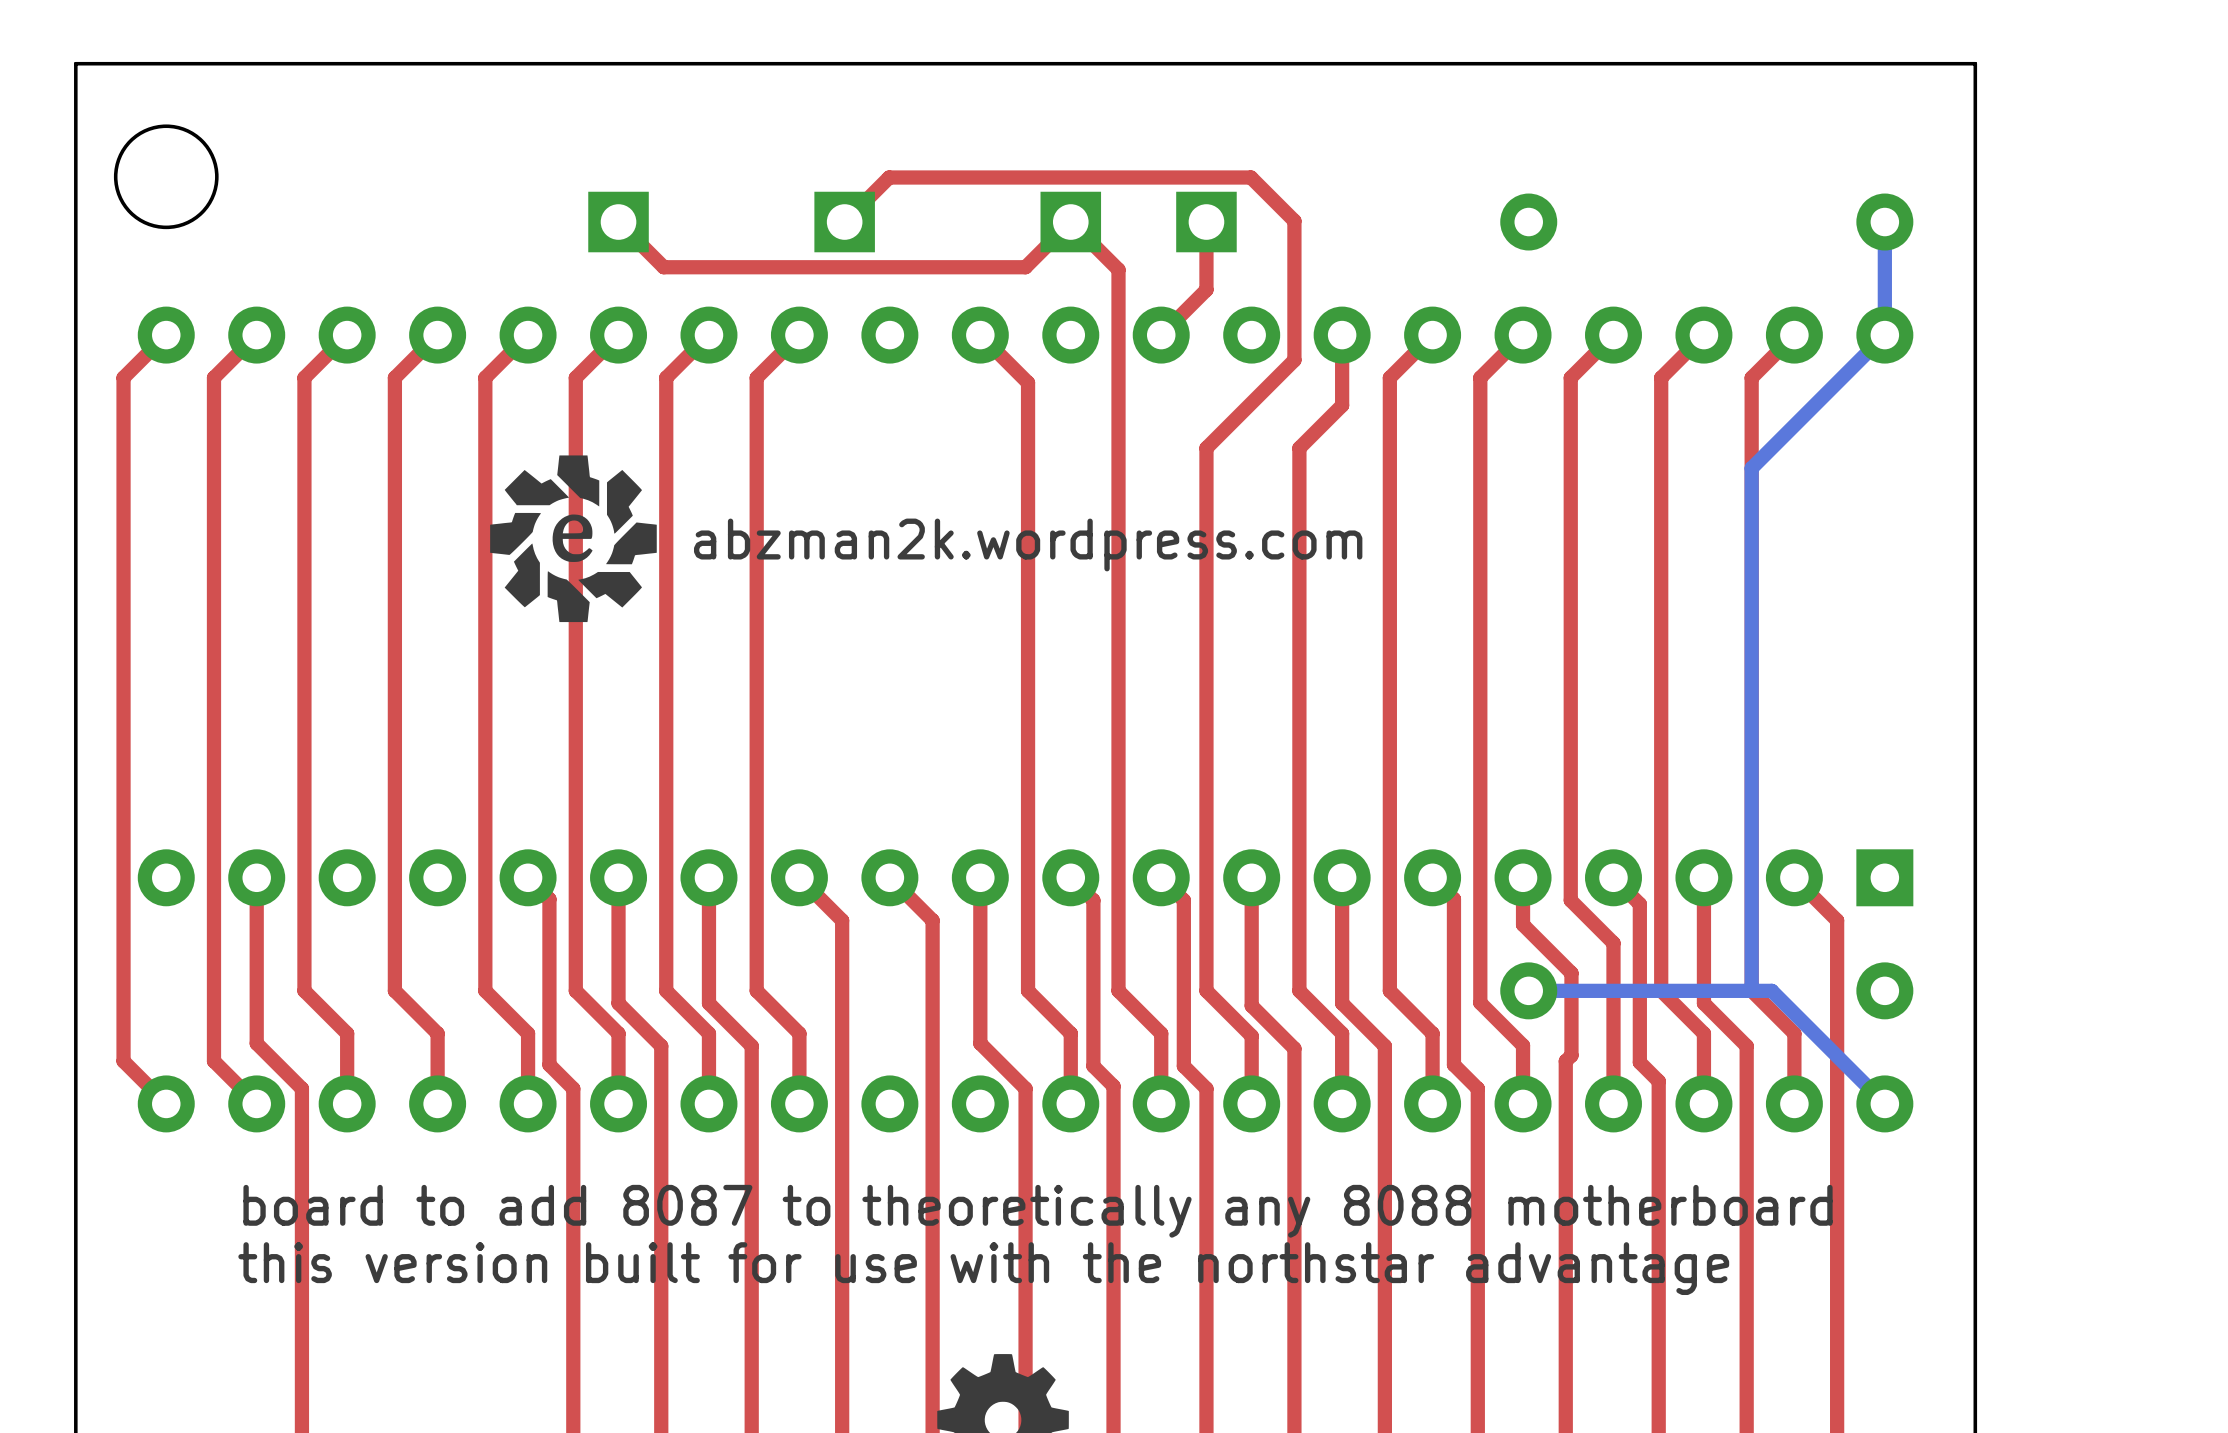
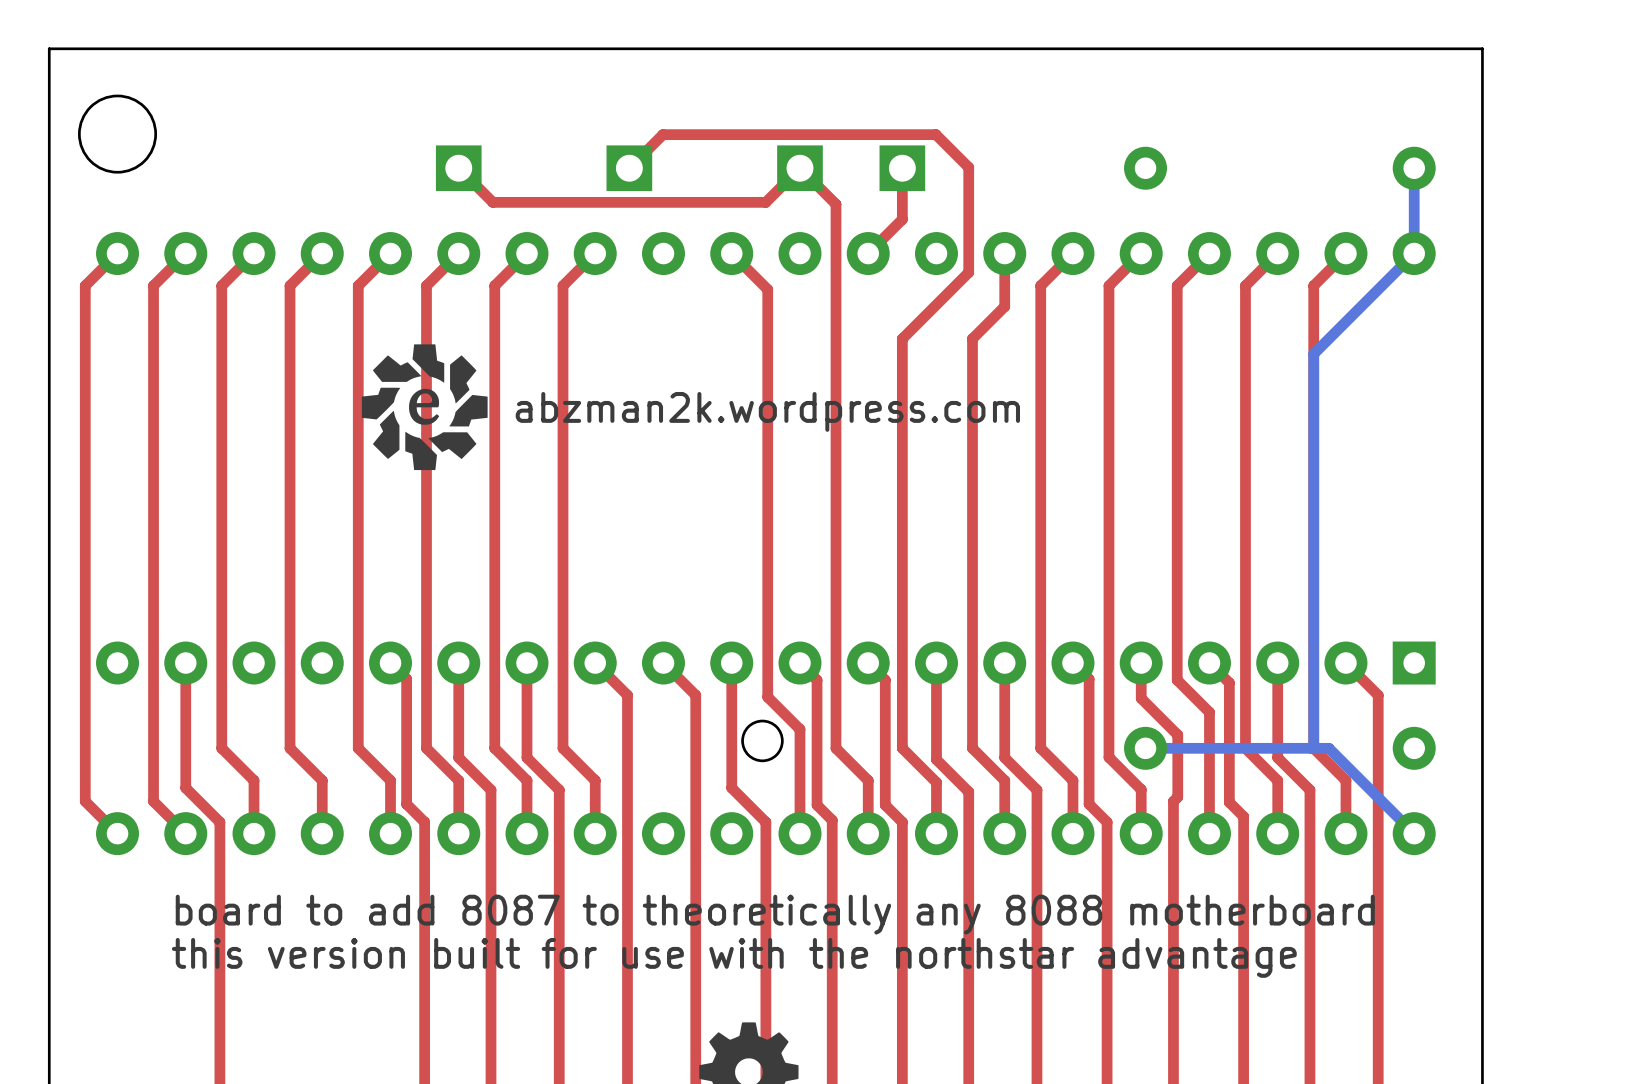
top track: (1028, 923) (1028, 990) (1070, 1033) -> (767, 697) (799, 729) (799, 780)
round board edge: none -> [741, 719, 784, 763]

